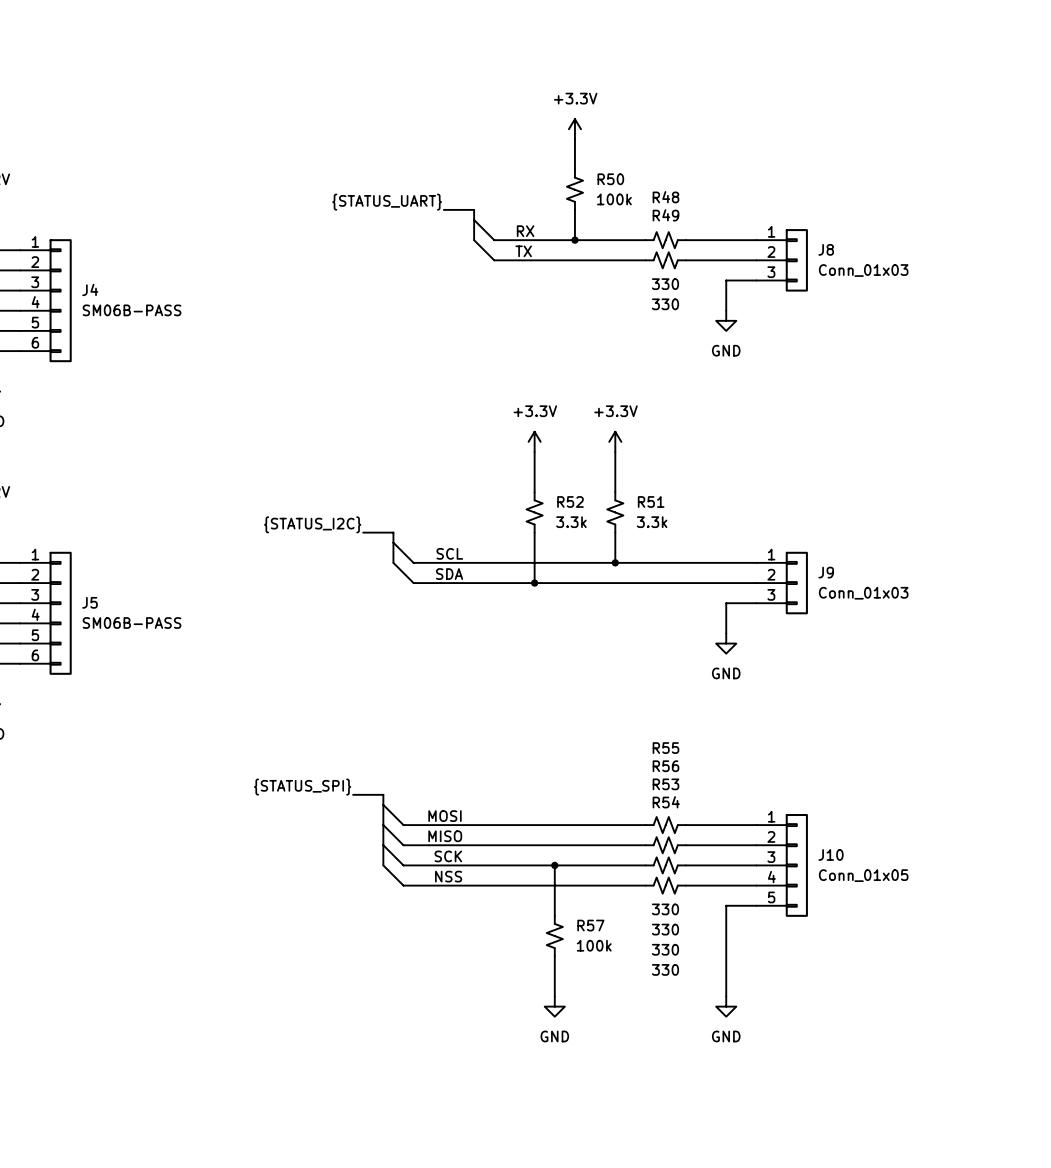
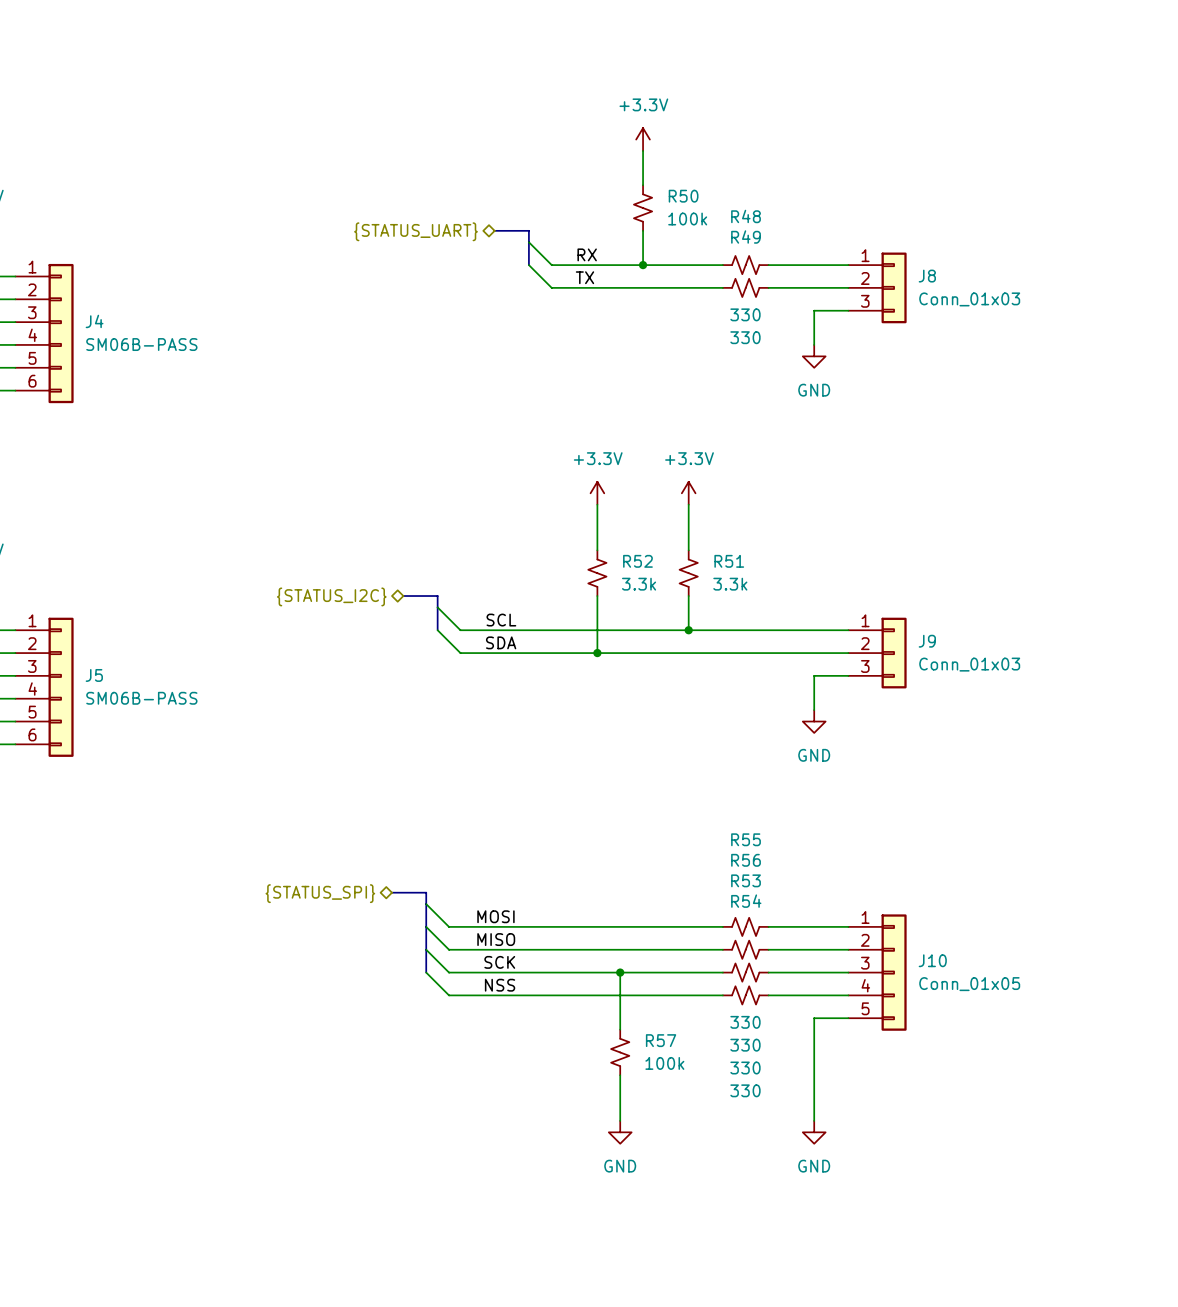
label: {STATUS_UART} (387, 202) -> none
hierarchical label: none -> {STATUS_UART} (416, 231)
label: {STATUS_I2C} (312, 524) -> none
hierarchical label: none -> {STATUS_I2C} (331, 596)
label: {STATUS_SPI} (302, 787) -> none
hierarchical label: none -> {STATUS_SPI} (320, 893)

